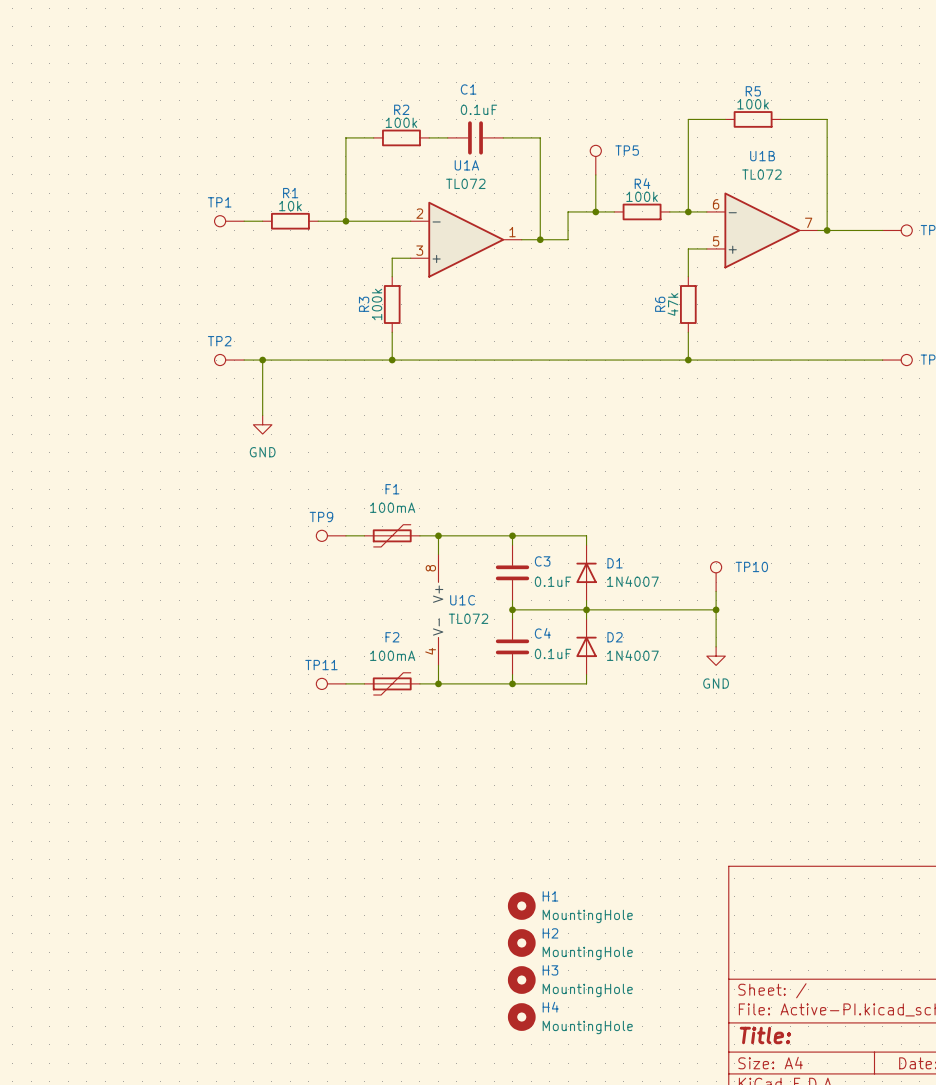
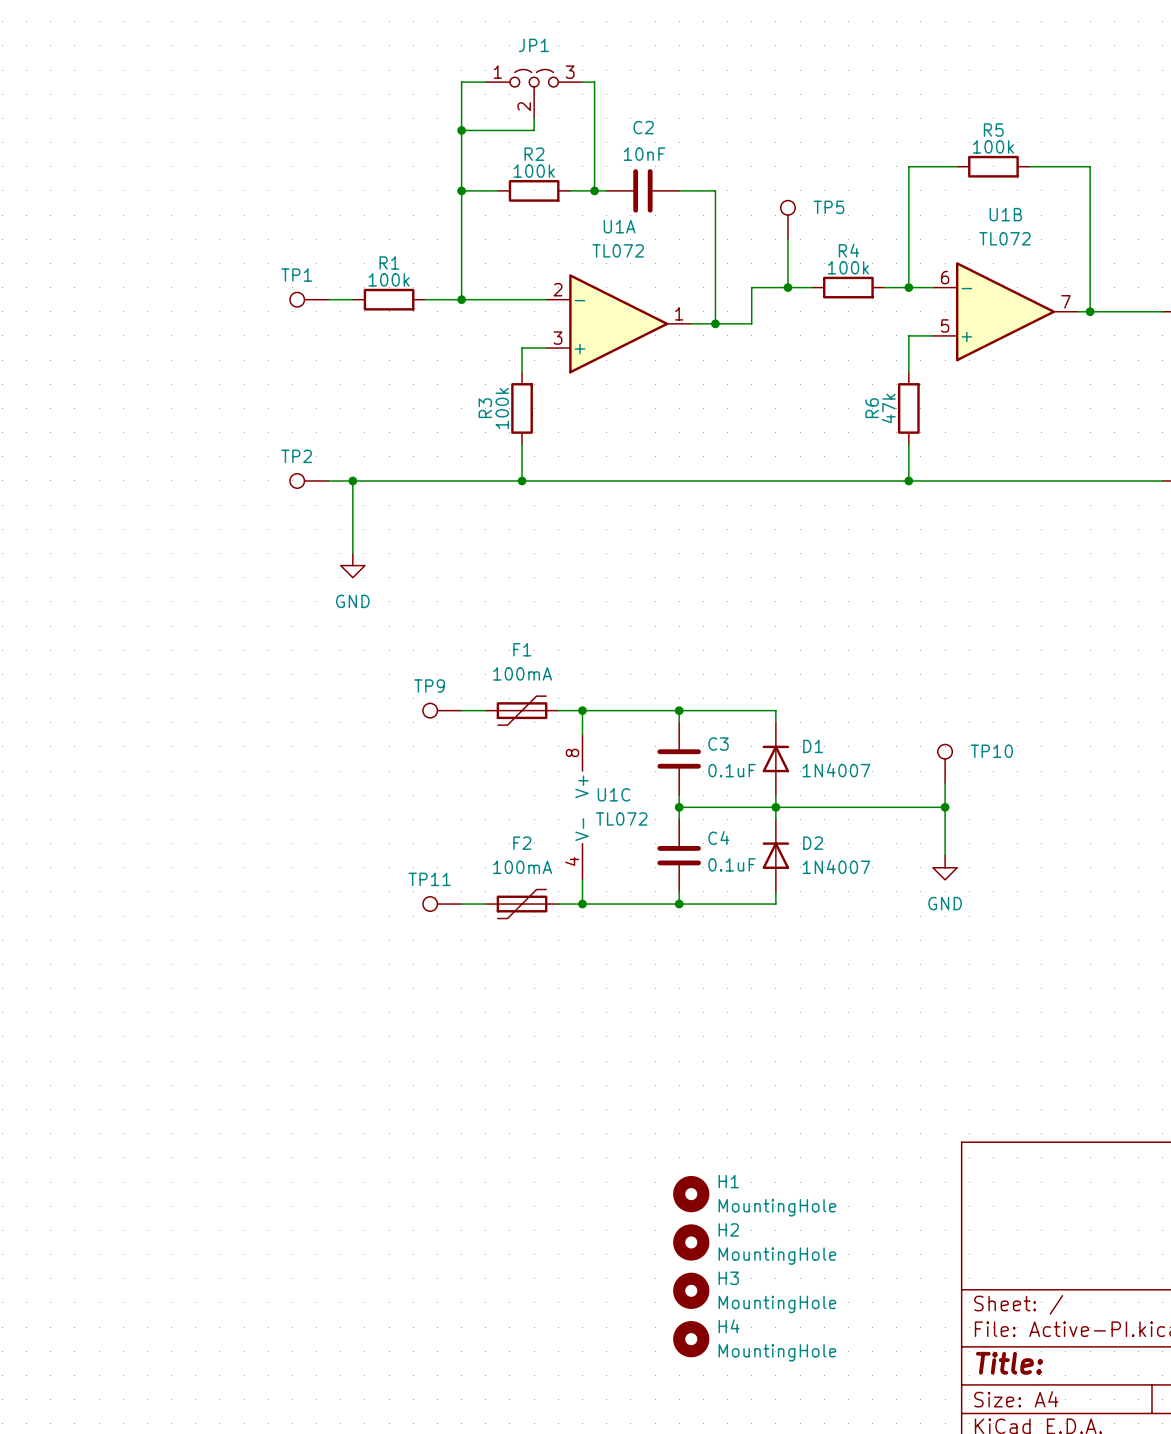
wire: none -> (485, 82) (461, 82) (461, 190)
wire: none -> (582, 82) (594, 82) (594, 190) (606, 190)
JP1: none -> (534, 93)
wire: none -> (534, 118) (534, 130) (461, 130)
junction: none -> (461, 130)
junction: none -> (461, 190)
junction: none -> (594, 190)
C1: 0.1uF (475, 137) -> none
C2: none -> 10nF (642, 190)
R1 value: 10k (290, 206) -> 100k (389, 279)

